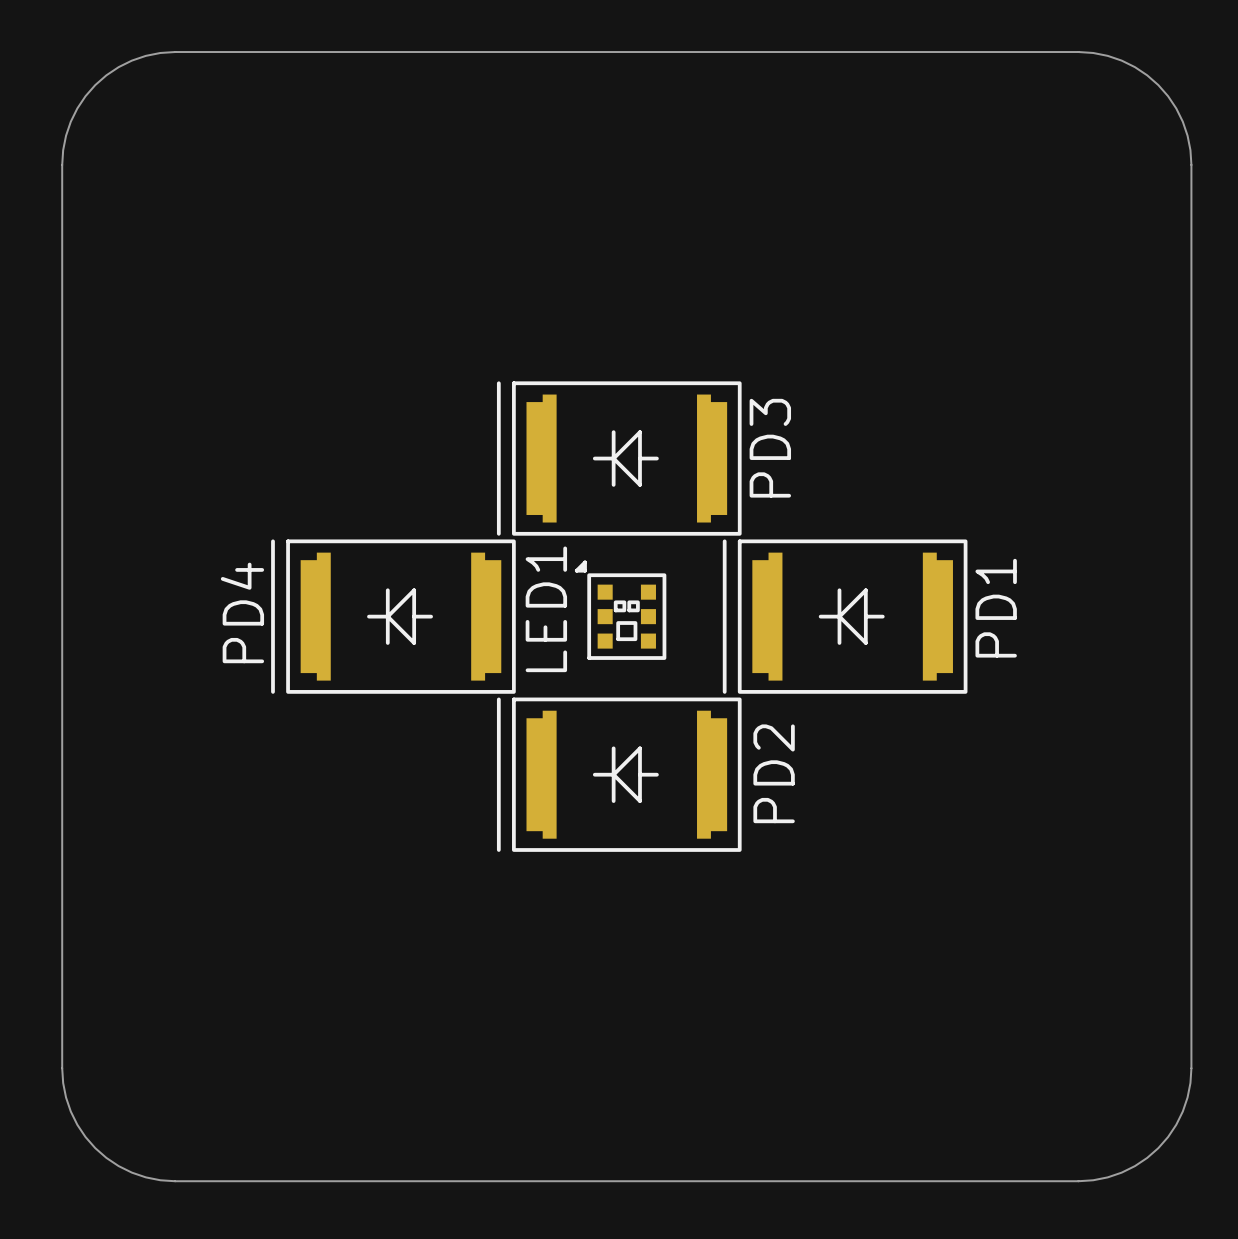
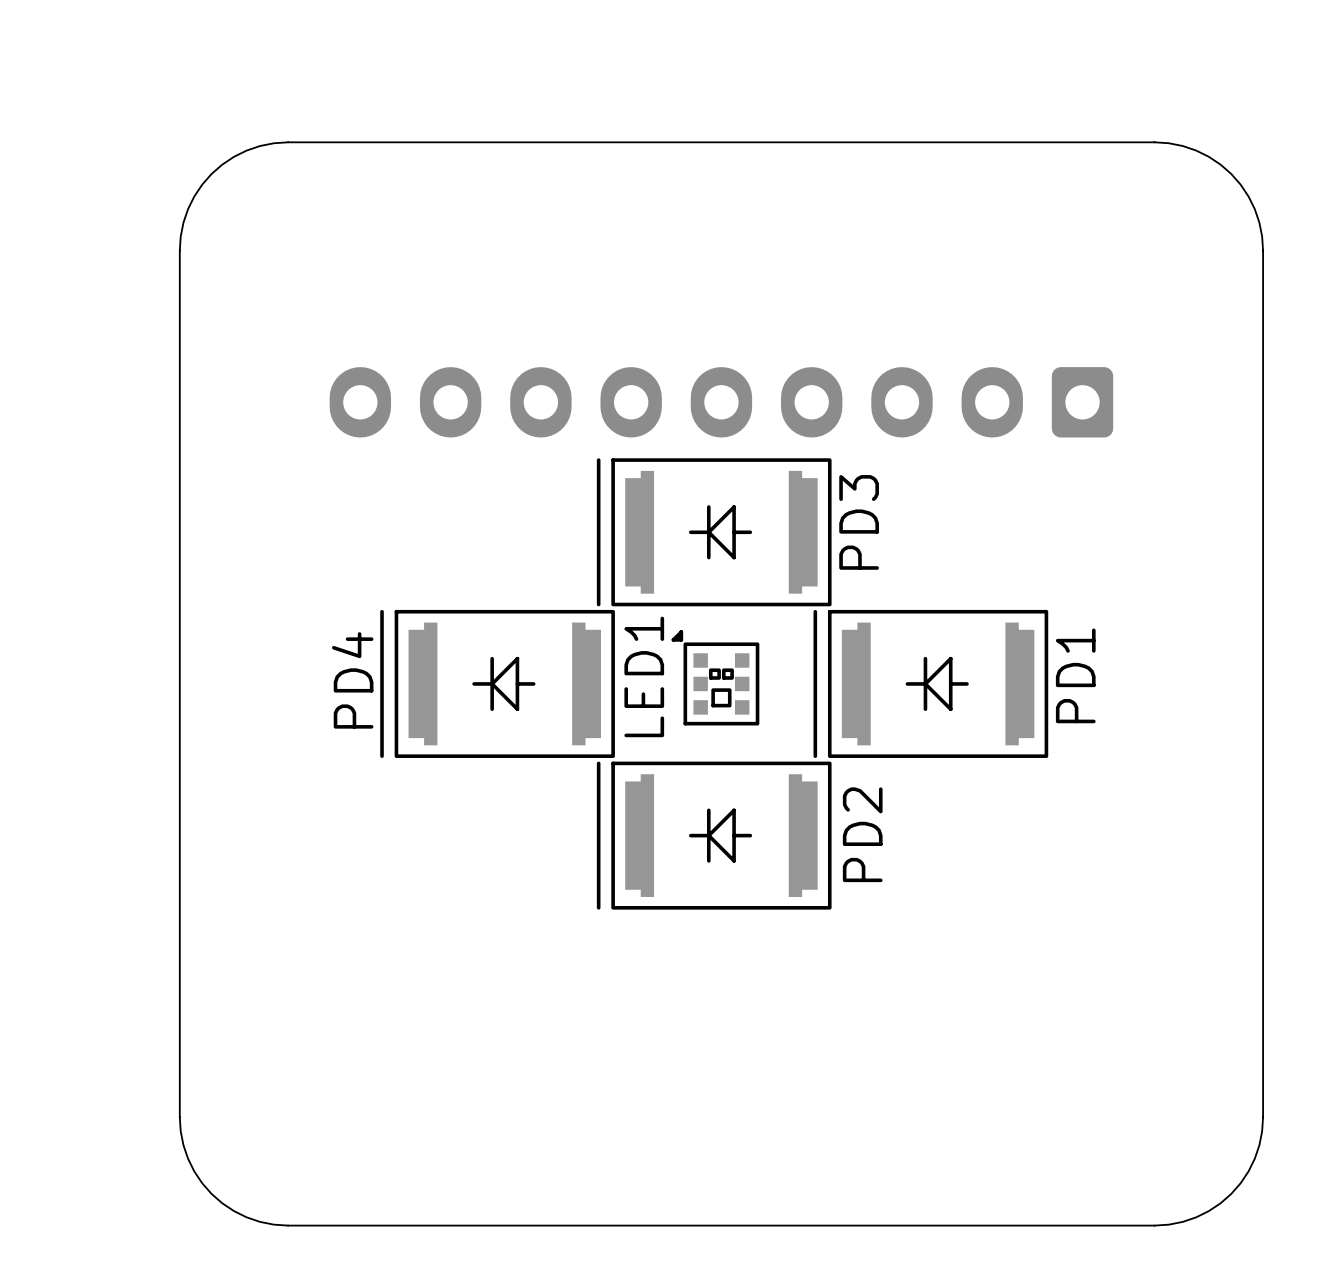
part: none -> (721, 402)

